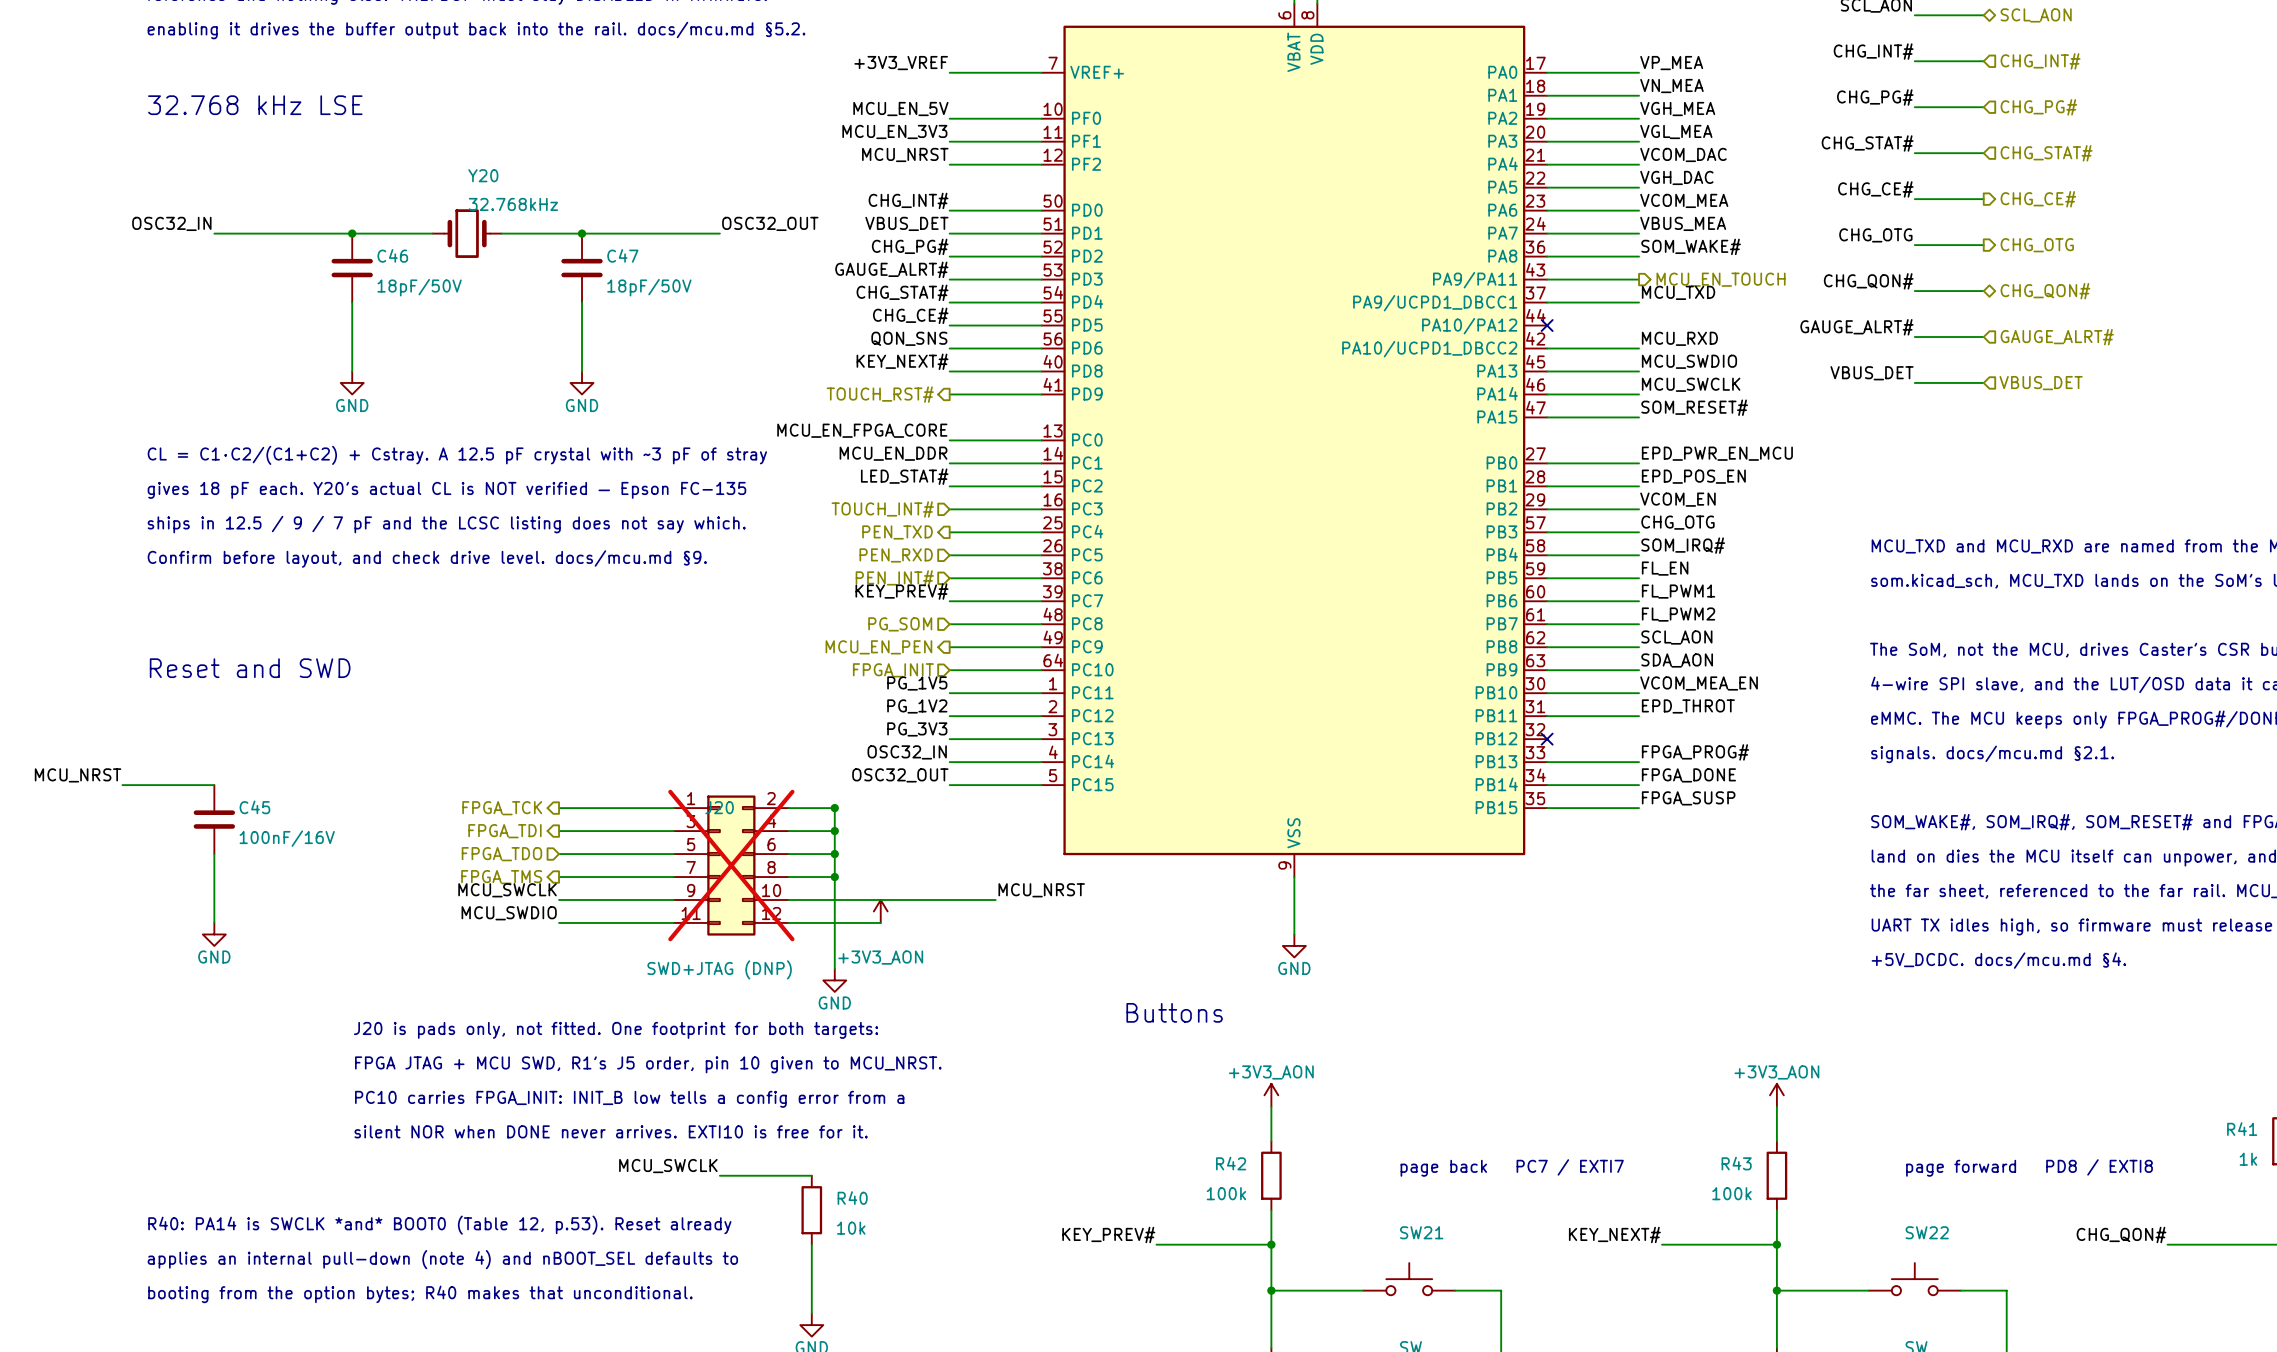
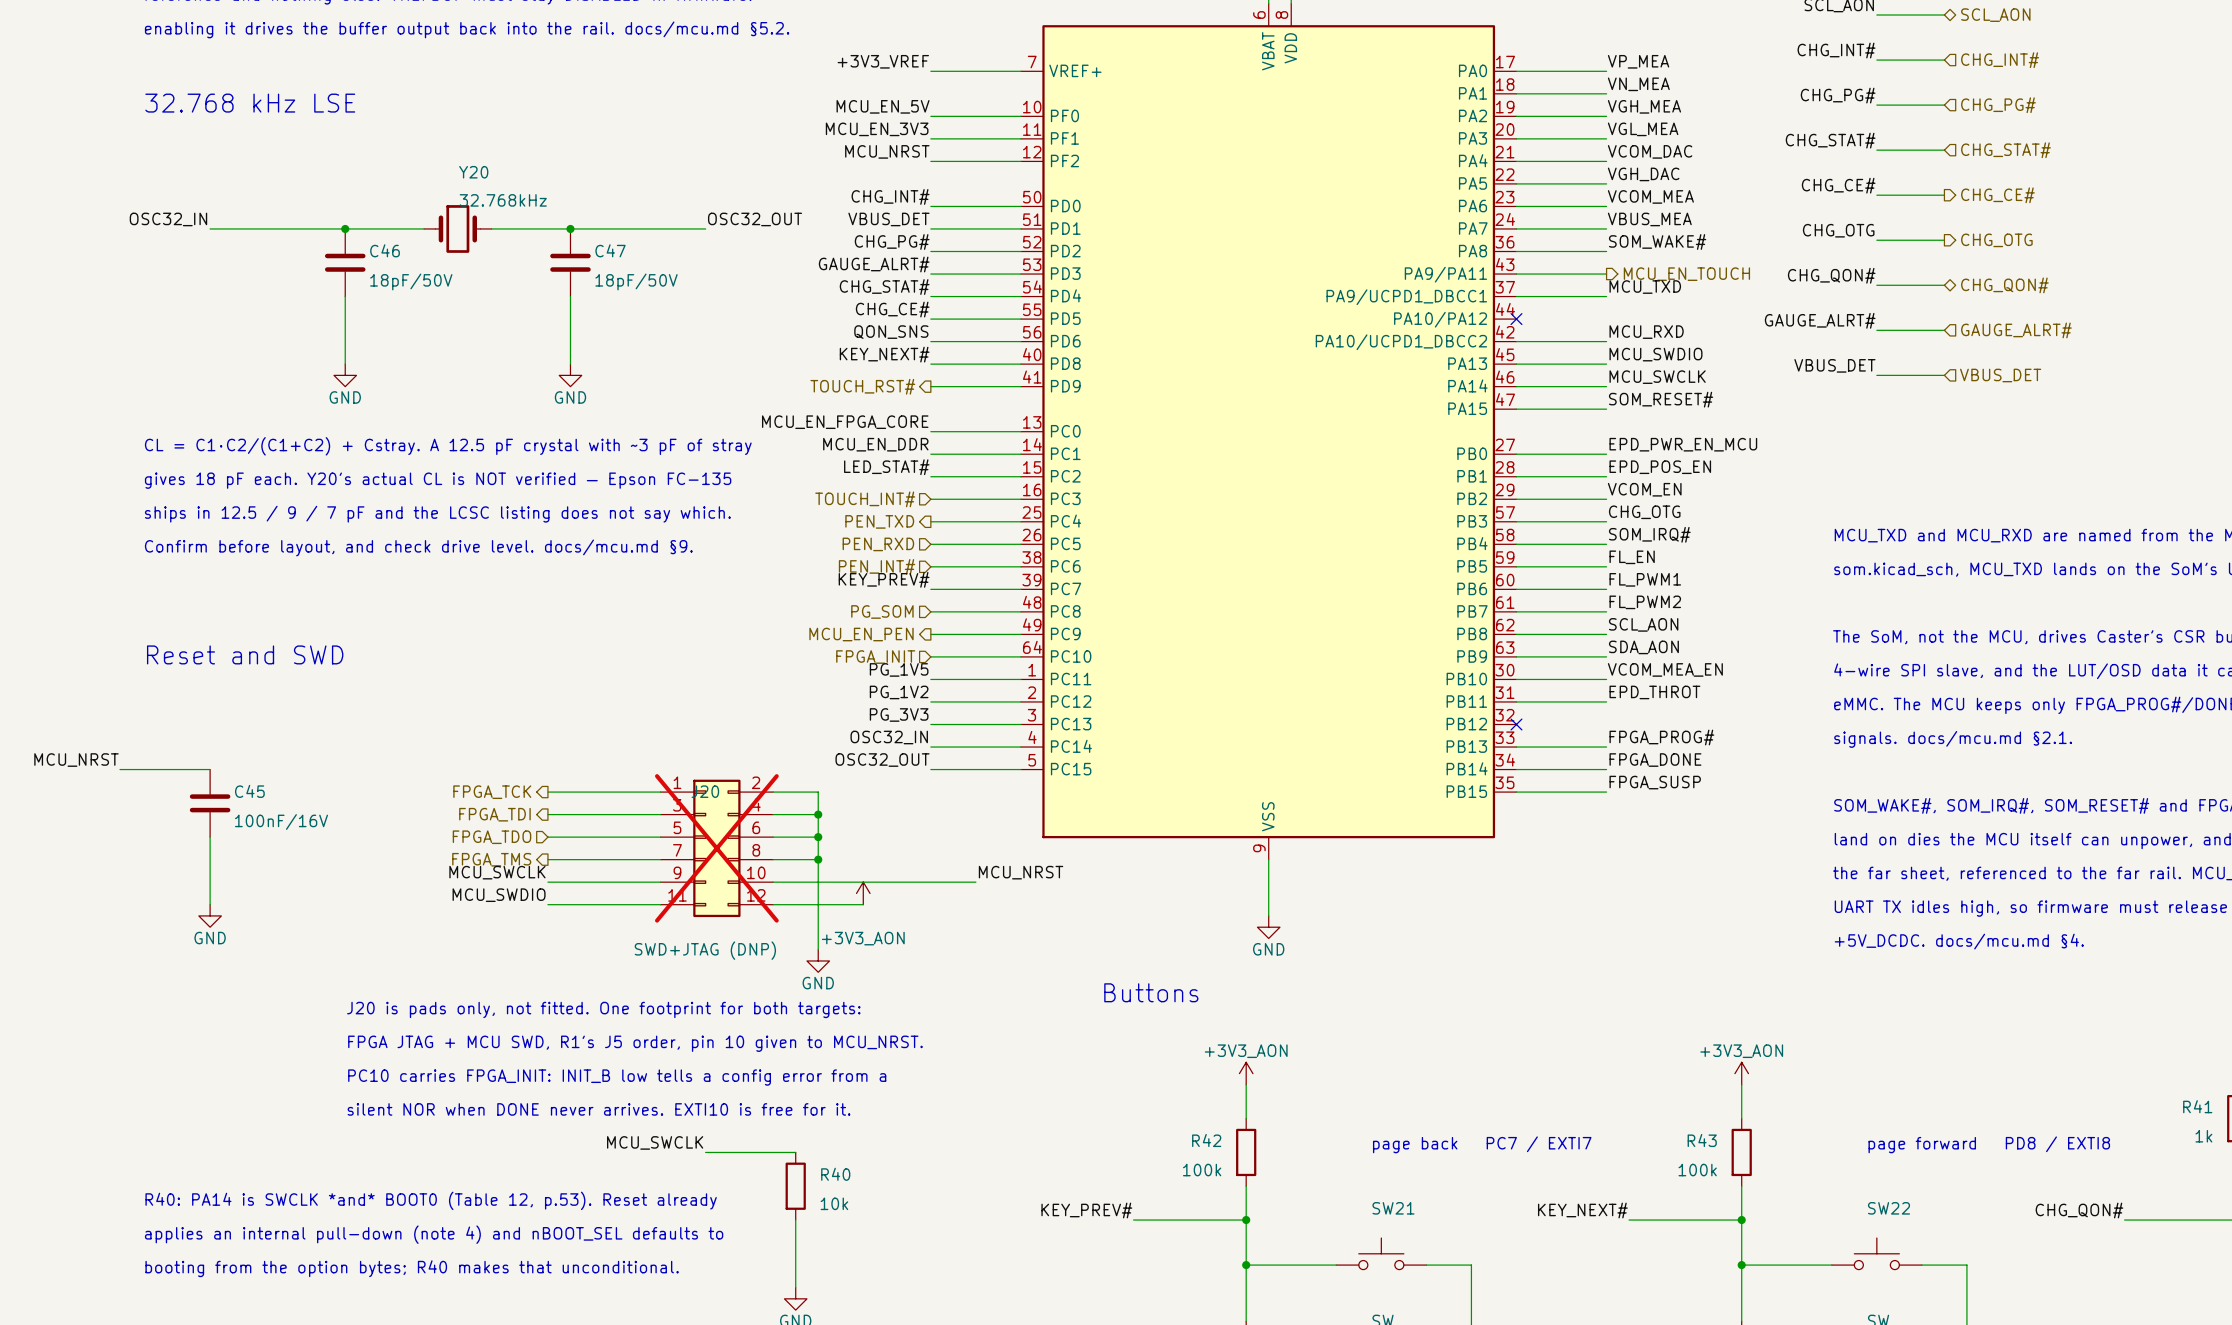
junction: (834, 808) -> none

